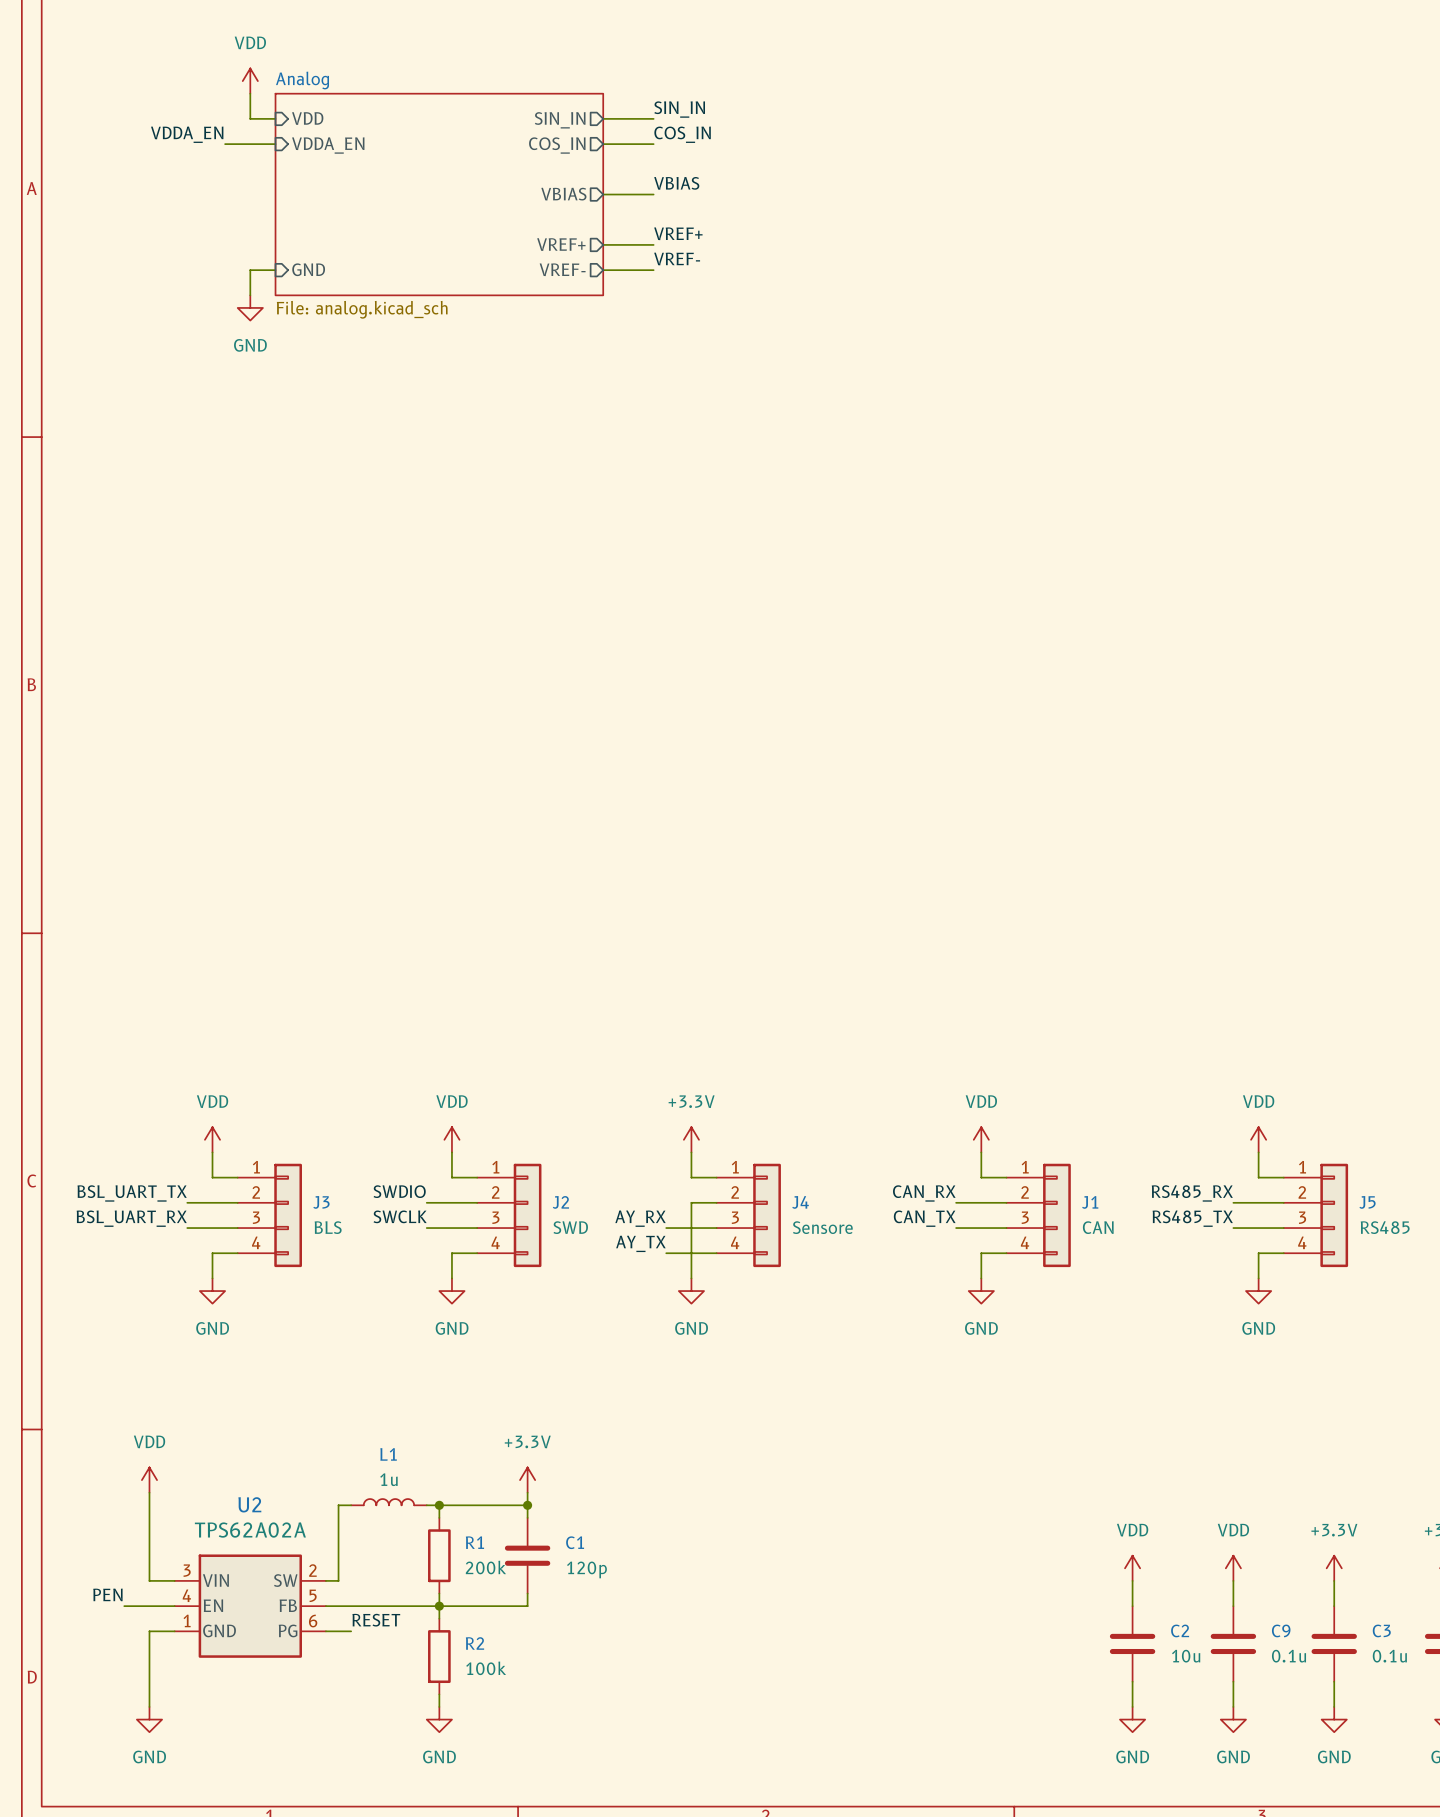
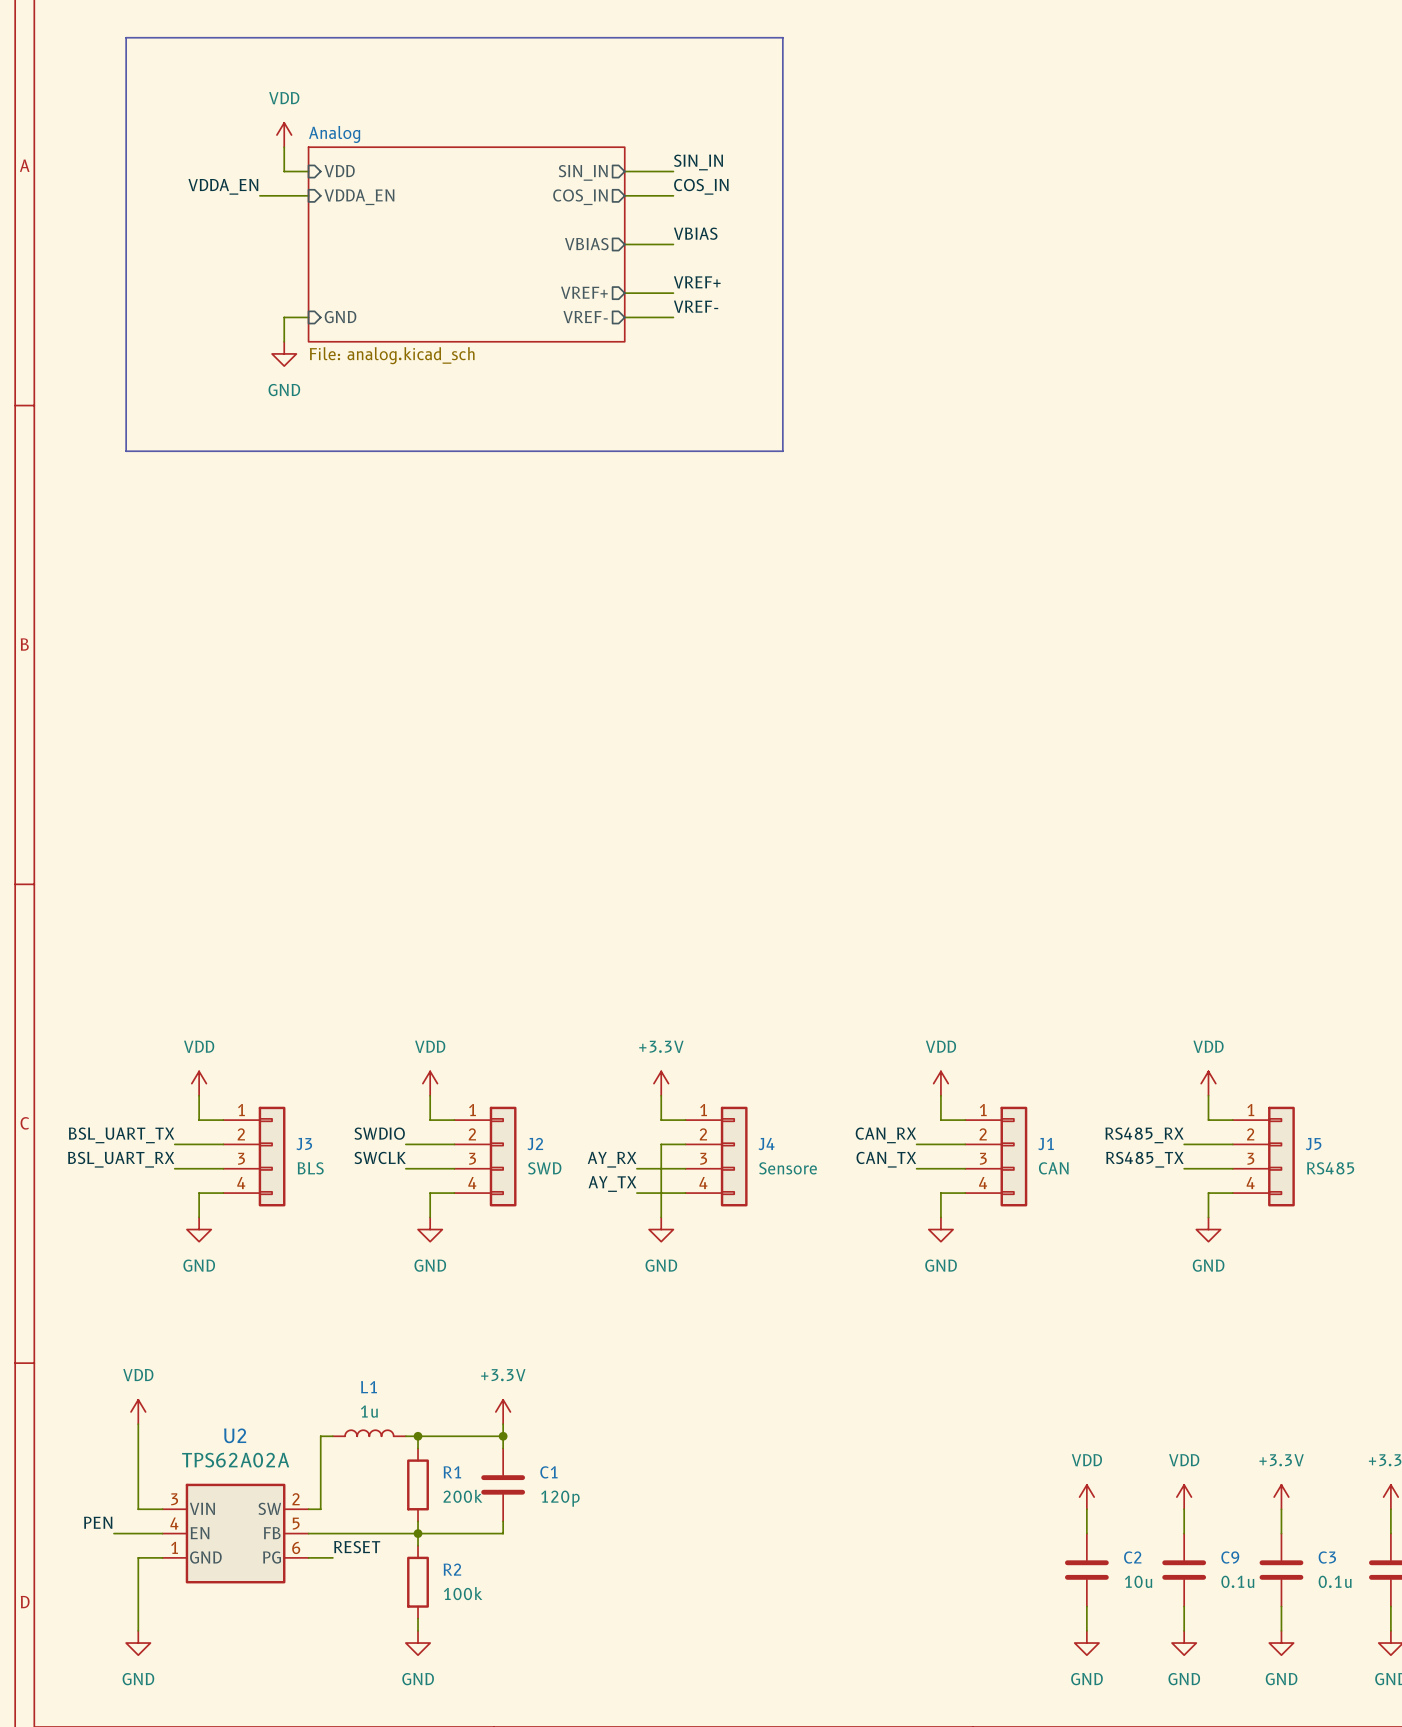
line: none -> (126, 37) (782, 37) (782, 451) (126, 451) (126, 37)
power symbol position: VDD (250, 81) -> VDD (284, 135)
wire: (250, 93) (250, 118) (275, 118) -> (284, 147) (284, 171) (308, 171)
label position: SIN_IN (679, 109) -> SIN_IN (698, 162)
sheet pin position: VDD (307, 118) -> VDD (339, 171)
wire: (603, 118) (653, 118) -> (624, 317) (673, 317)
sheet pin position: SIN_IN (560, 120) -> SIN_IN (583, 172)
label position: VDDA_EN (187, 134) -> VDDA_EN (223, 186)
label position: COS_IN (682, 134) -> COS_IN (701, 186)
wire: (225, 144) (275, 144) -> (259, 195) (308, 195)
wire: (603, 144) (653, 144) -> (624, 195) (673, 195)
sheet pin position: VDDA_EN (328, 145) -> VDDA_EN (359, 197)
sheet pin position: COS_IN (557, 145) -> COS_IN (580, 197)
label position: VBIAS (676, 183) -> VBIAS (695, 233)
sheet Analog position: (439, 194) -> (466, 244)
sheet pin position: VBIAS (563, 194) -> VBIAS (586, 244)
wire: (603, 194) (653, 194) -> (673, 171) (624, 171)
label position: VREF+ (678, 233) -> VREF+ (697, 282)
sheet pin position: VREF+ (561, 244) -> VREF+ (584, 292)
wire: (603, 244) (653, 244) -> (624, 293) (673, 293)
label position: VREF- (677, 258) -> VREF- (696, 306)
sheet pin position: GND (308, 269) -> GND (340, 317)
sheet pin position: VREF- (562, 269) -> VREF- (585, 317)
wire: (275, 270) (250, 270) (250, 295) -> (308, 317) (284, 317) (284, 341)
wire: (603, 270) (653, 270) -> (673, 244) (624, 244)
power symbol position: GND (250, 307) -> GND (284, 353)

